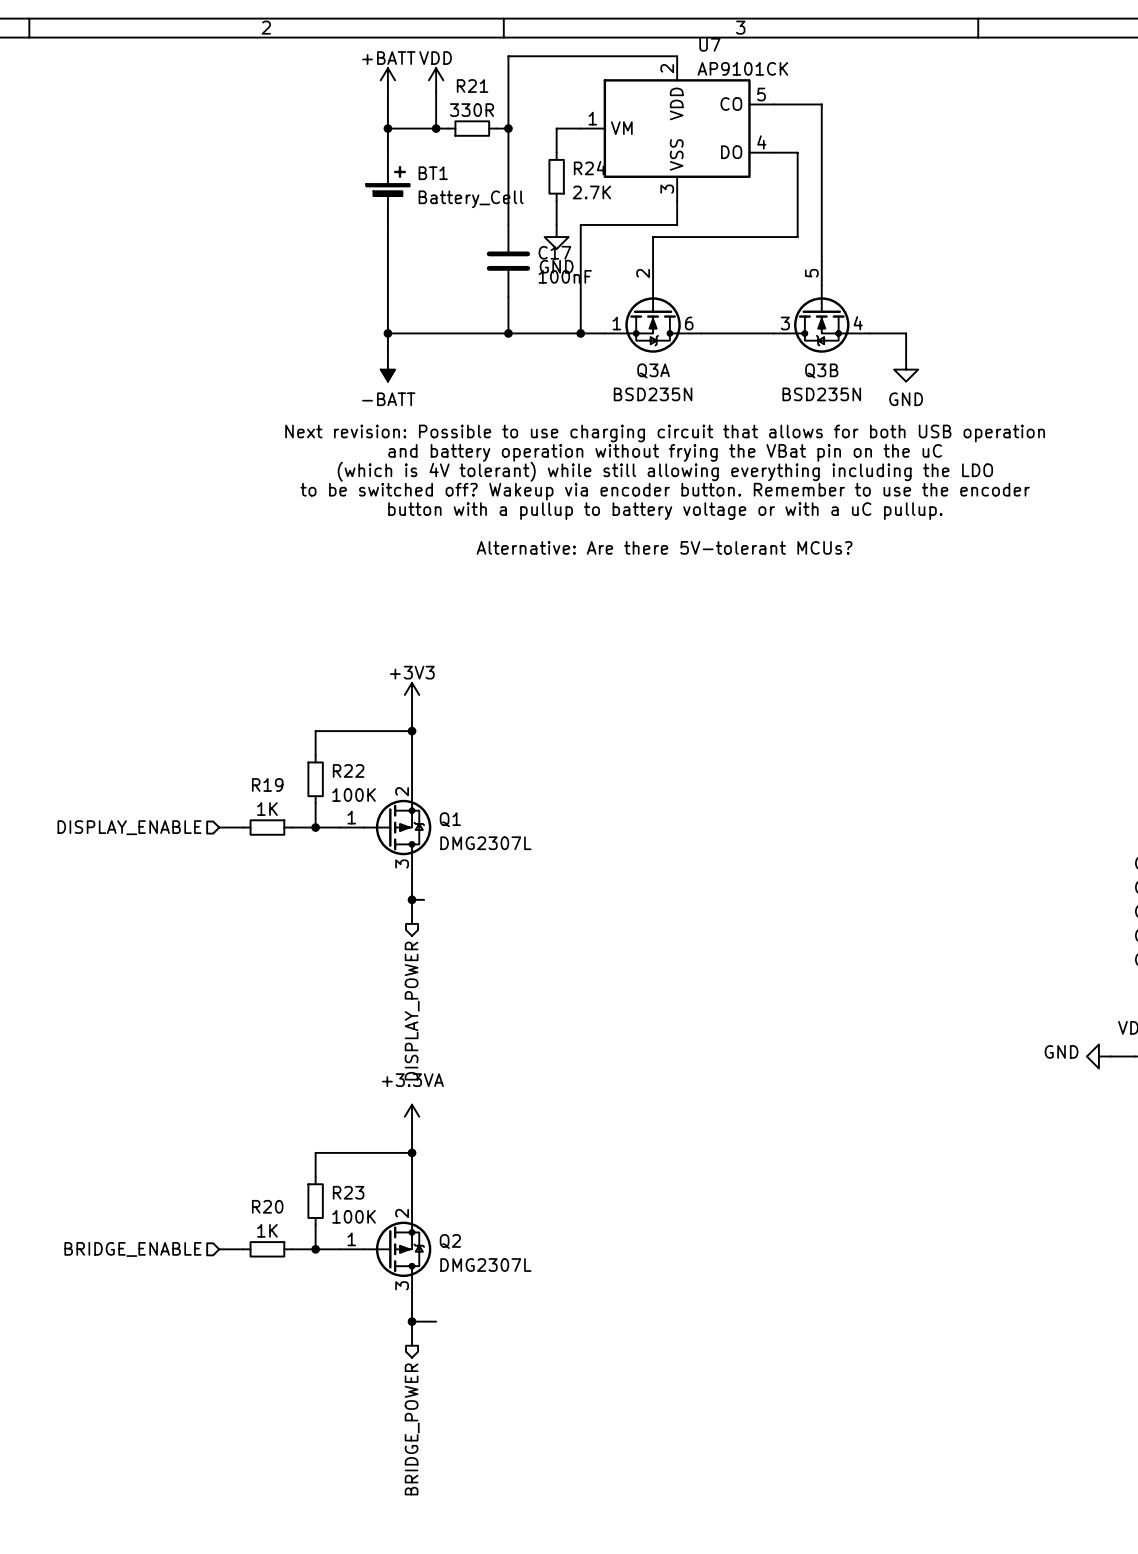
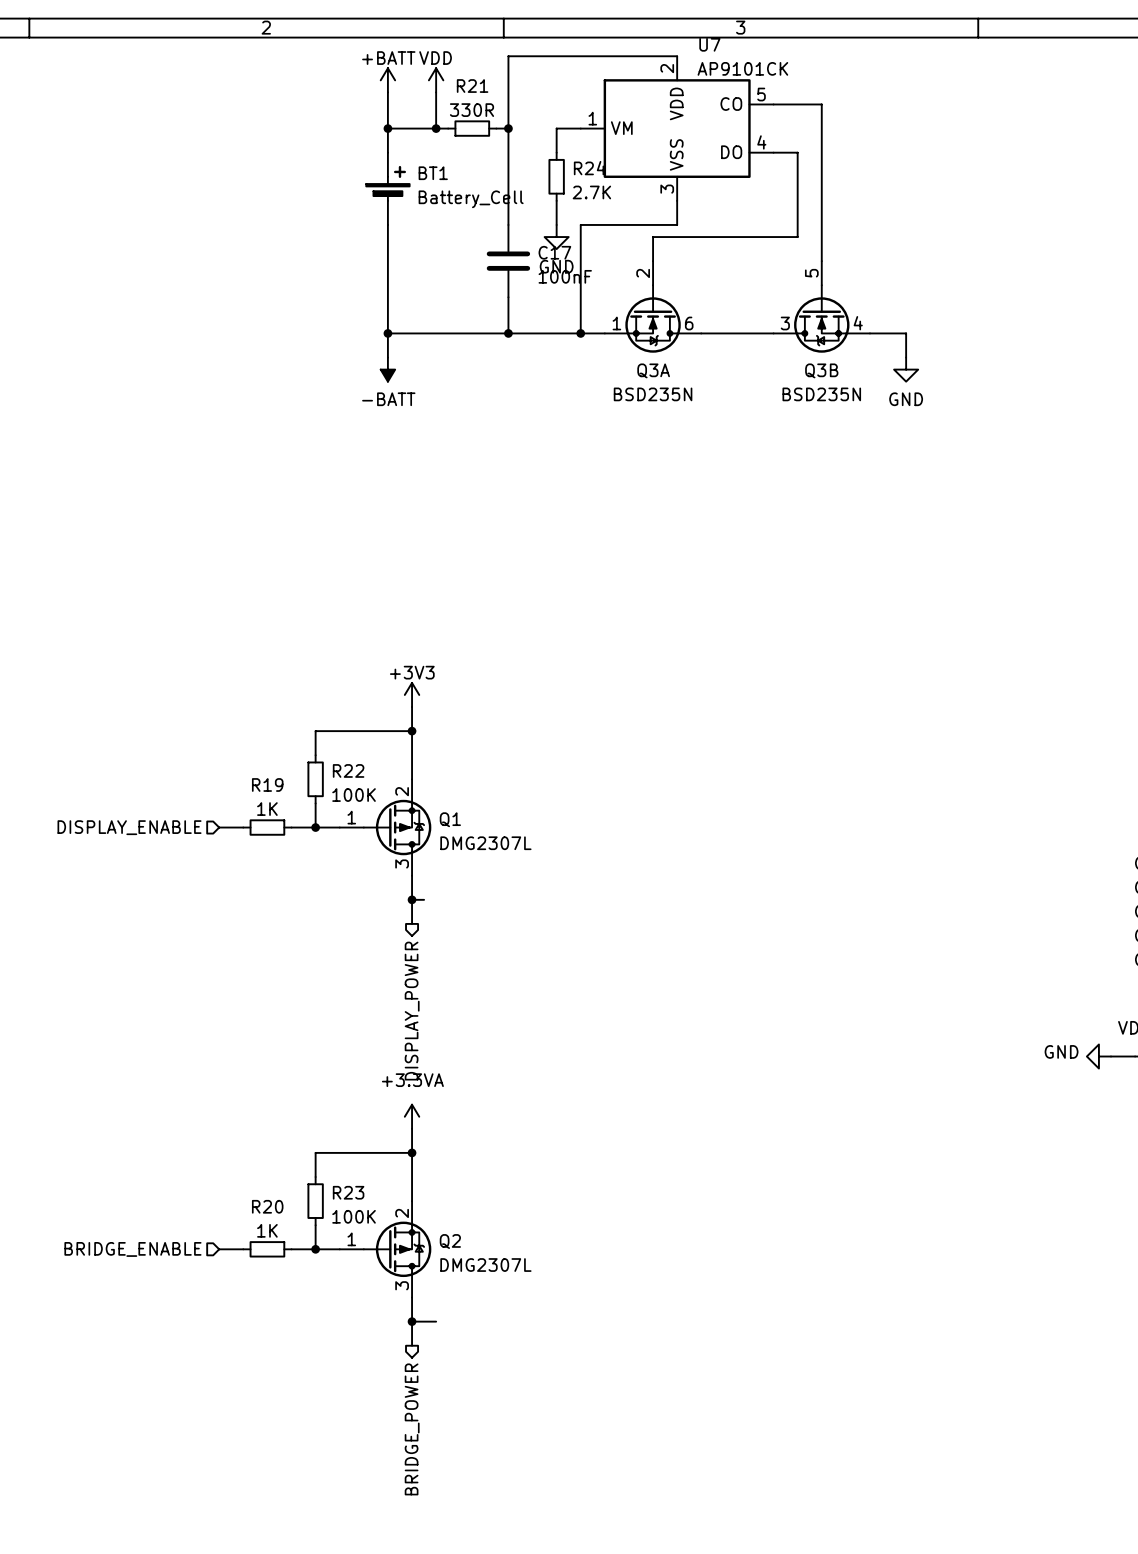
text: Next revision: Possible to use charging circuit that allows for both USB operation (665, 433) -> none
text: and battery operation without frying the VBat pin on the uC (665, 452) -> none
text: (which is 4V tolerant) while still allowing everything including the LDO (665, 471) -> none
text: to be switched off? Wakeup via encoder button. Remember to use the encoder (665, 491) -> none
text: button with a pullup to battery voltage or with a uC pullup. (665, 511) -> none
text: Alternative: Are there 5V-tolerant MCUs? (664, 547) -> none

